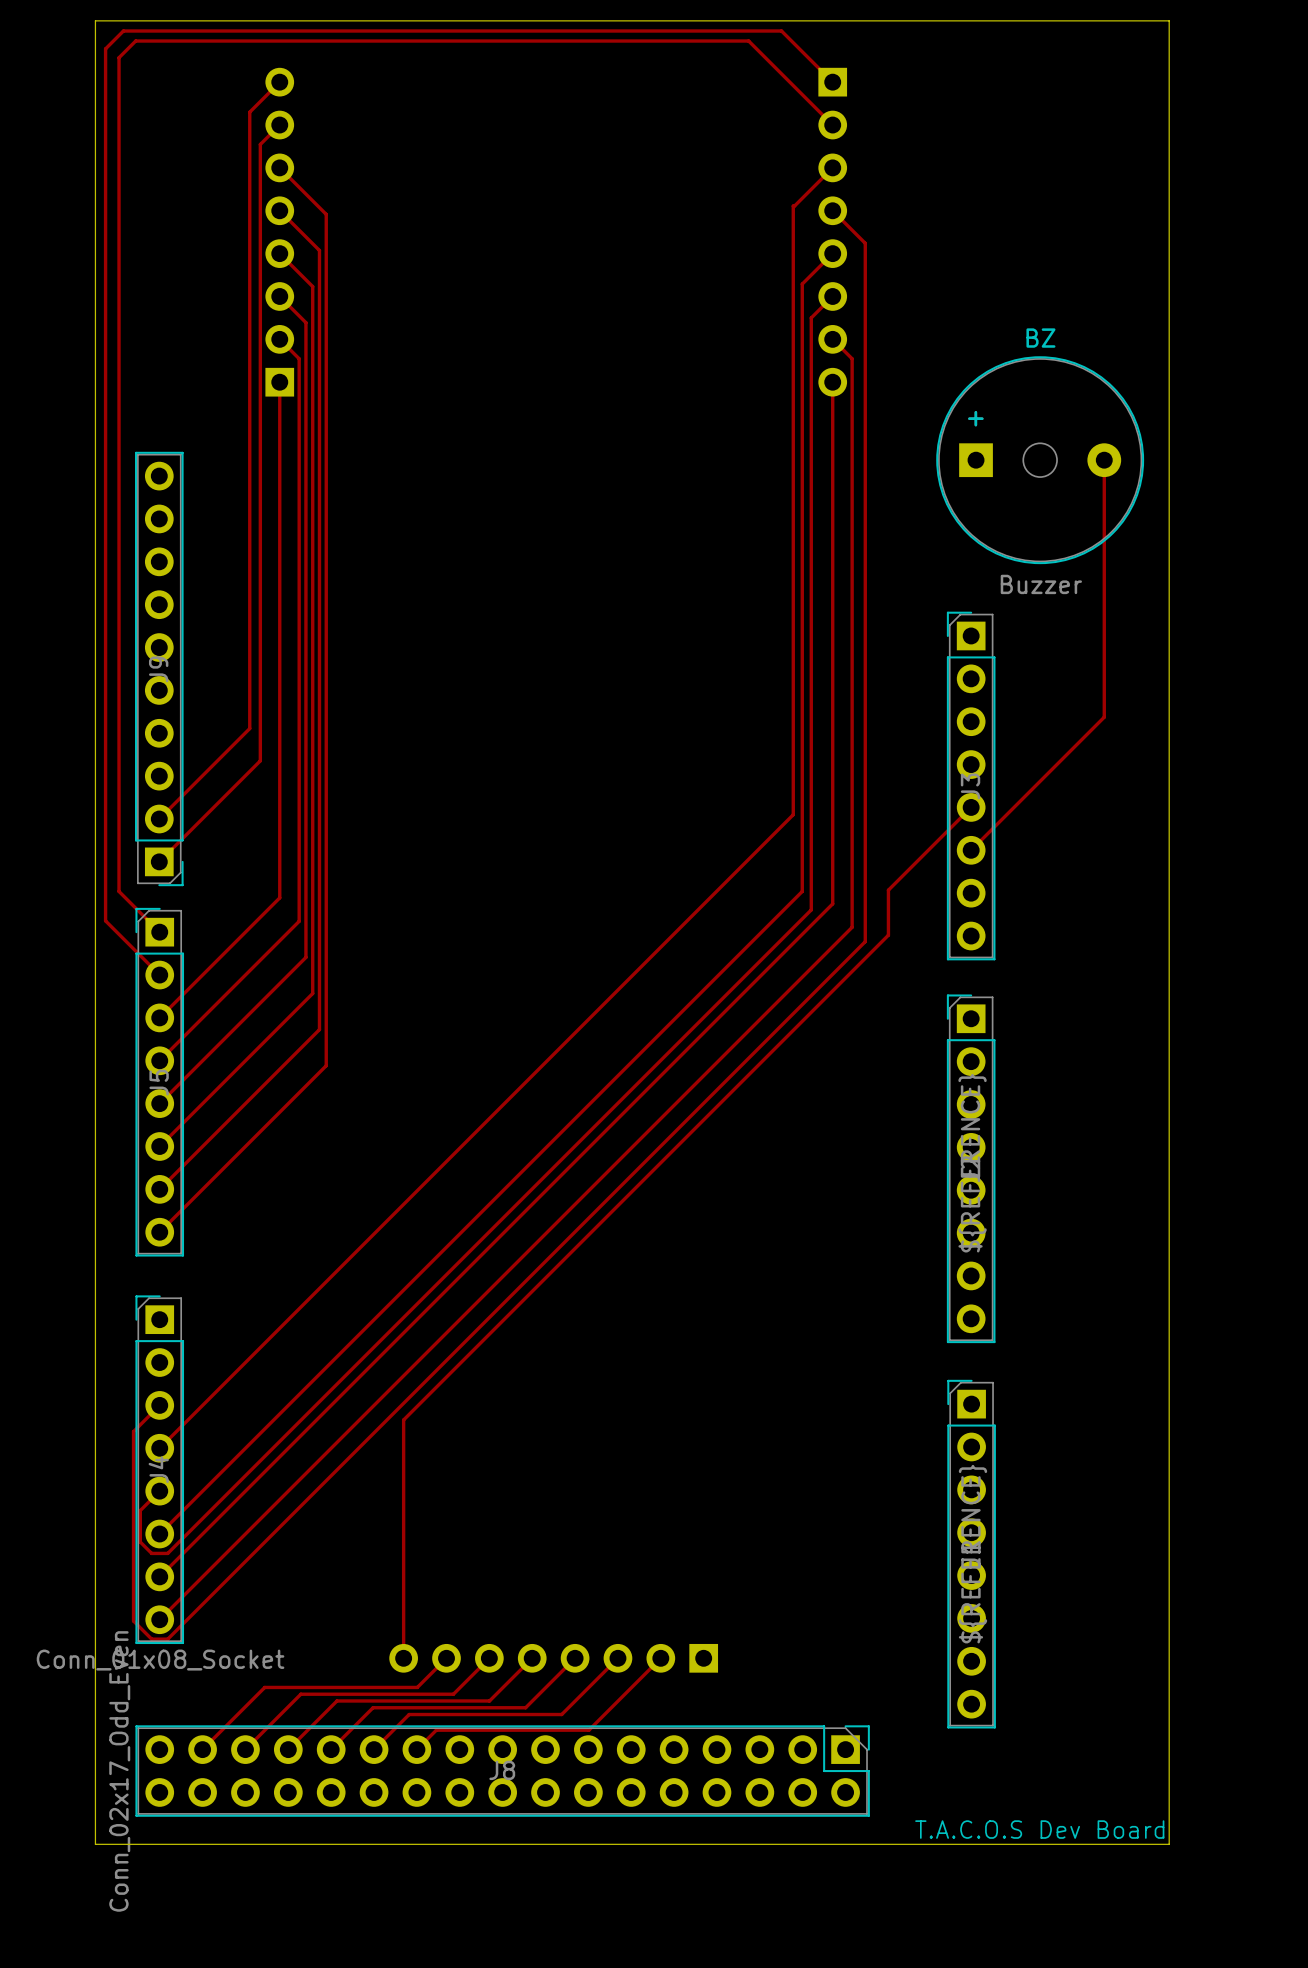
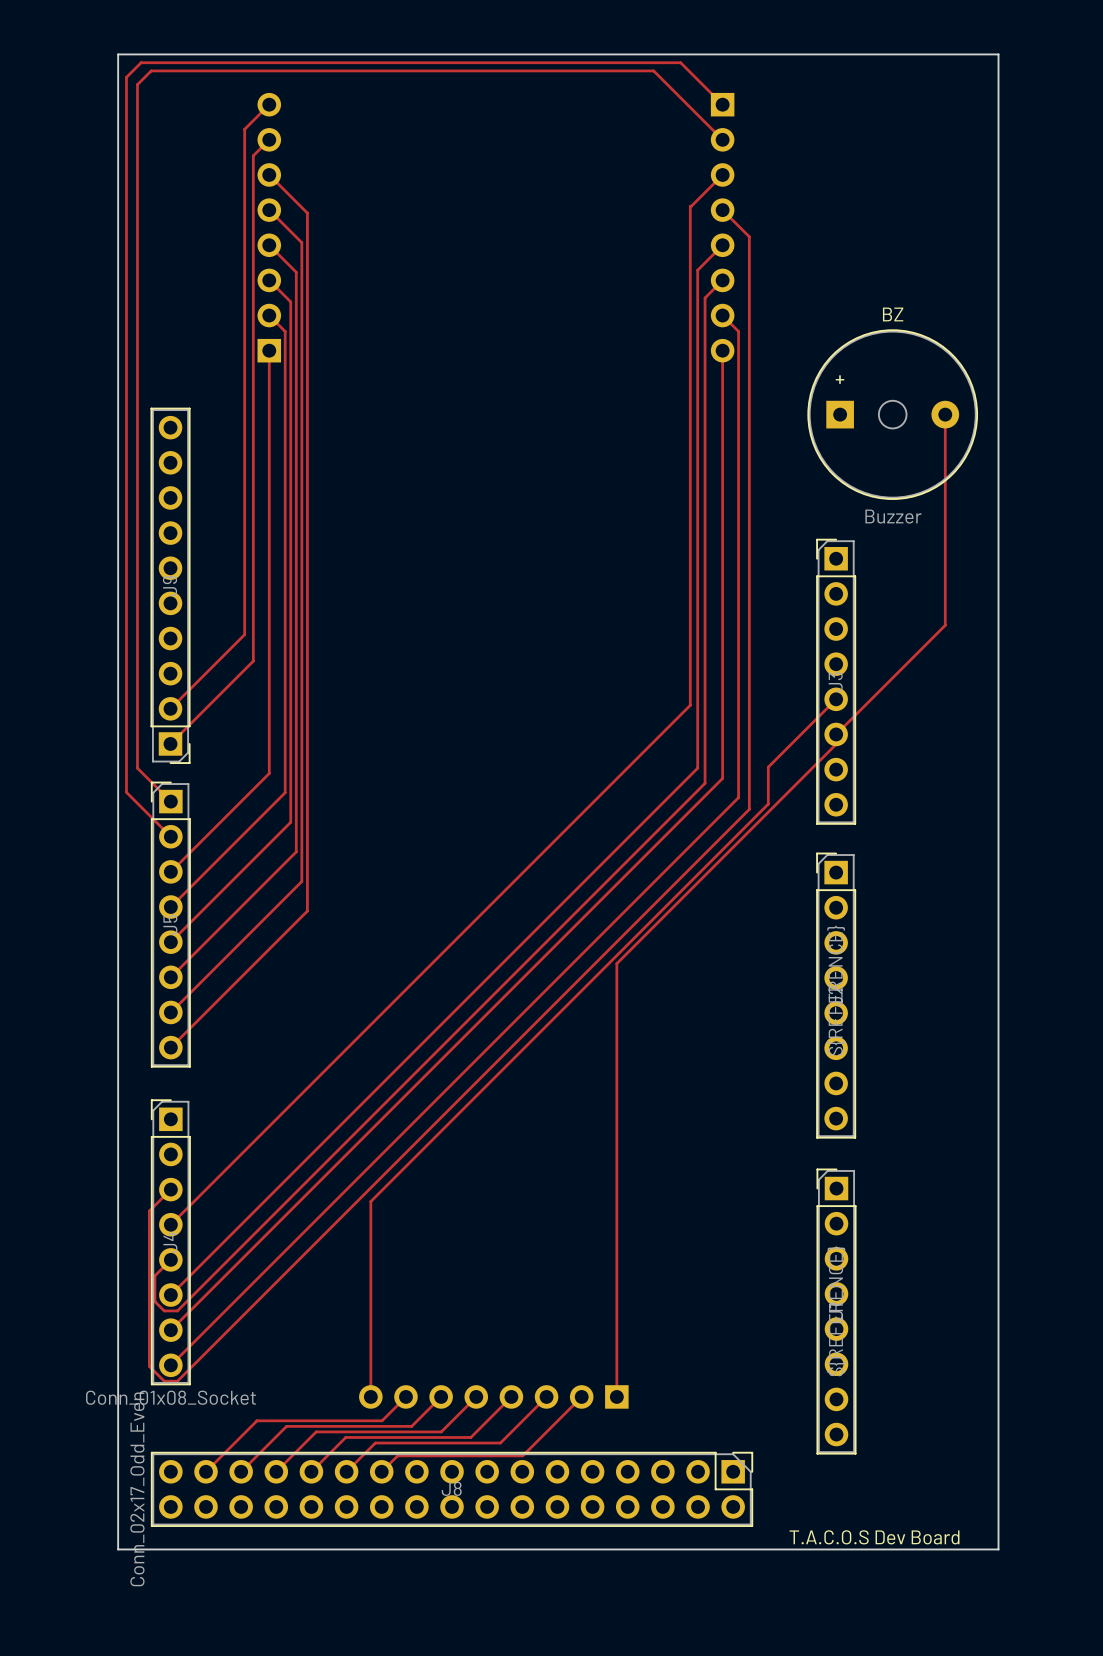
track: none -> (836, 734) (836, 744) (616, 963) (616, 1396)

